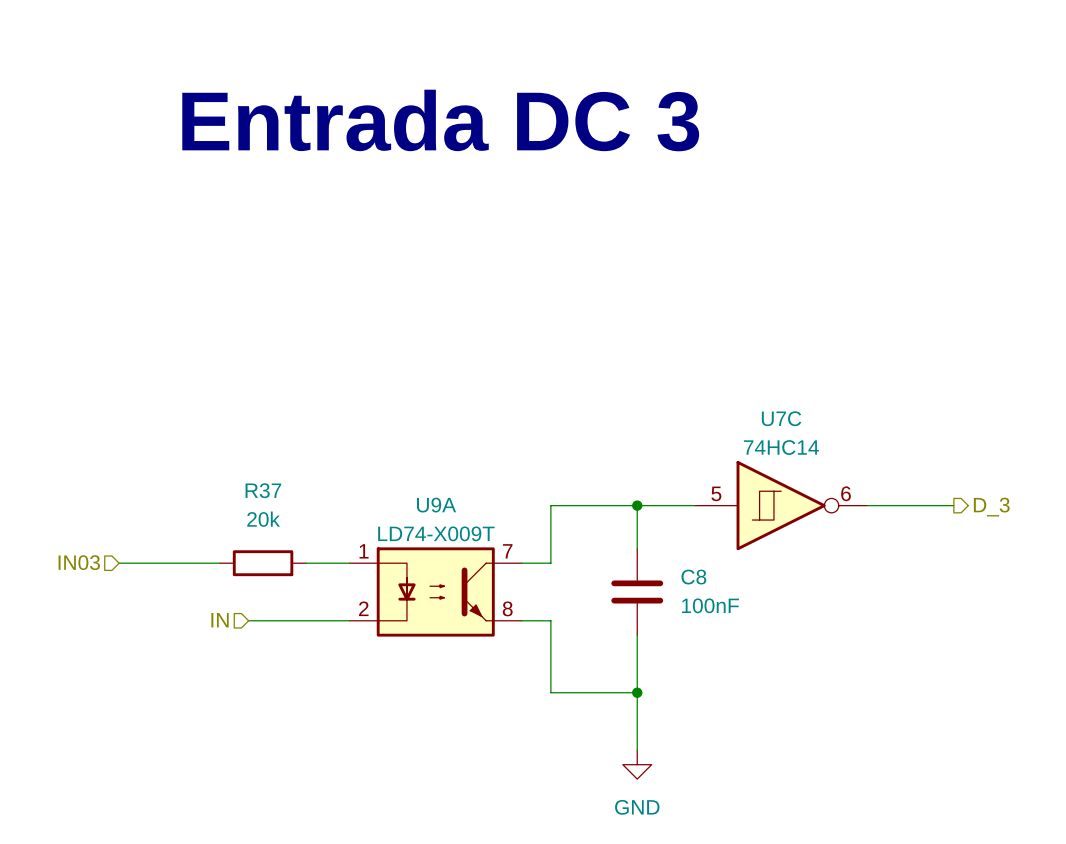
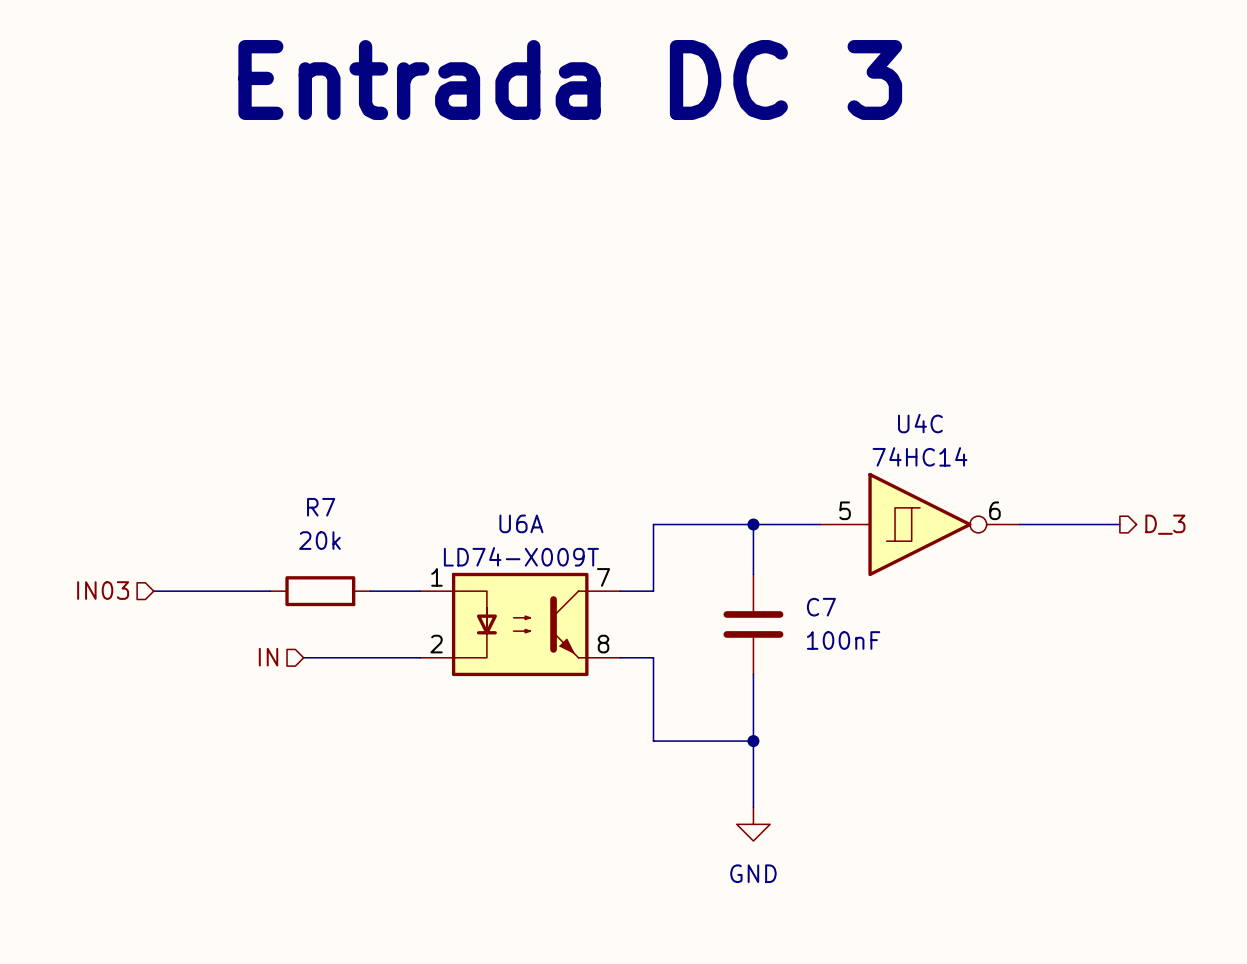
U7C name: U7C (781, 418) -> U4C (920, 423)
R37 name: R37 (263, 490) -> R7 (321, 507)
U9A name: U9A (436, 505) -> U6A (521, 523)
C8 name: C8 (693, 577) -> C7 (821, 607)

